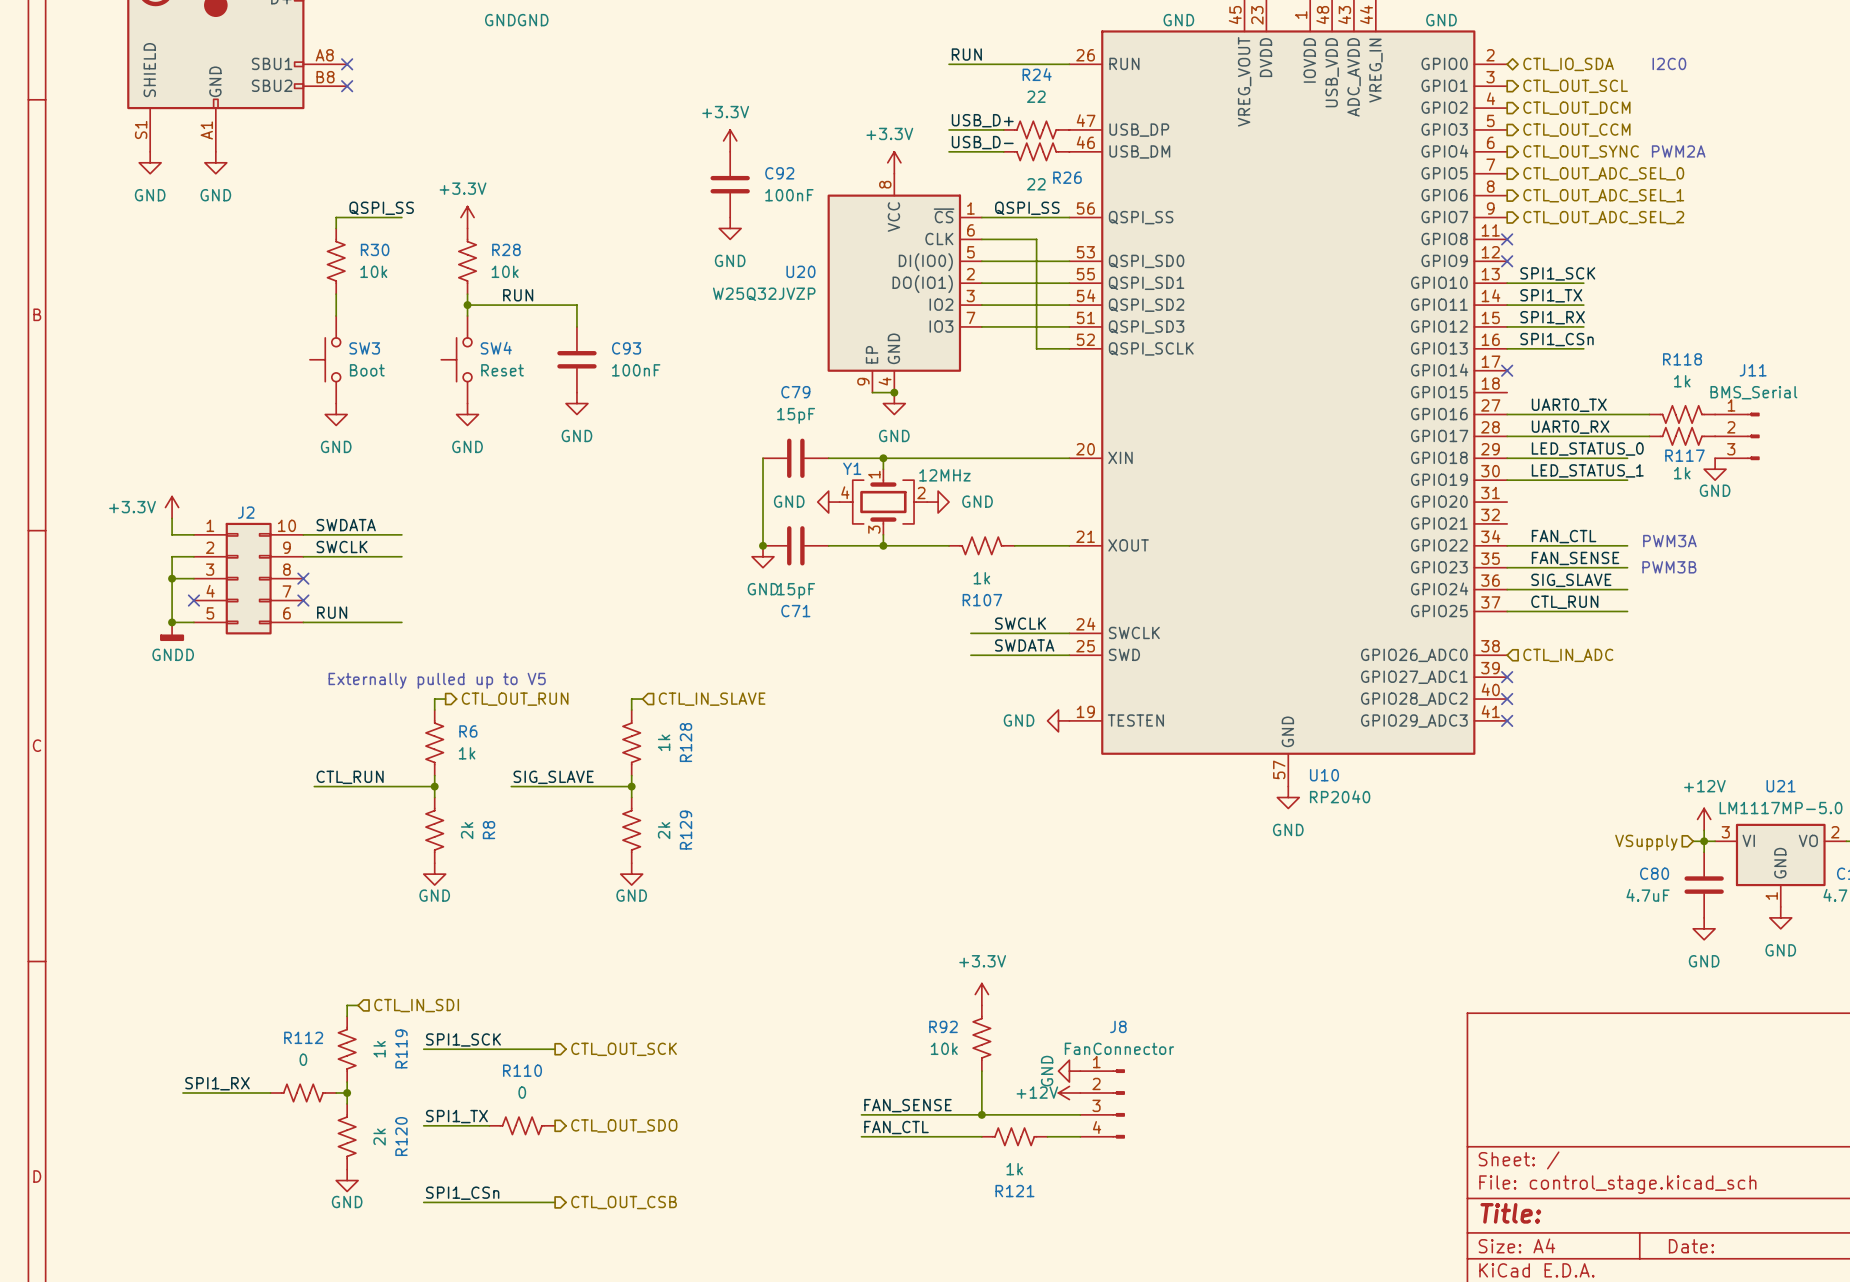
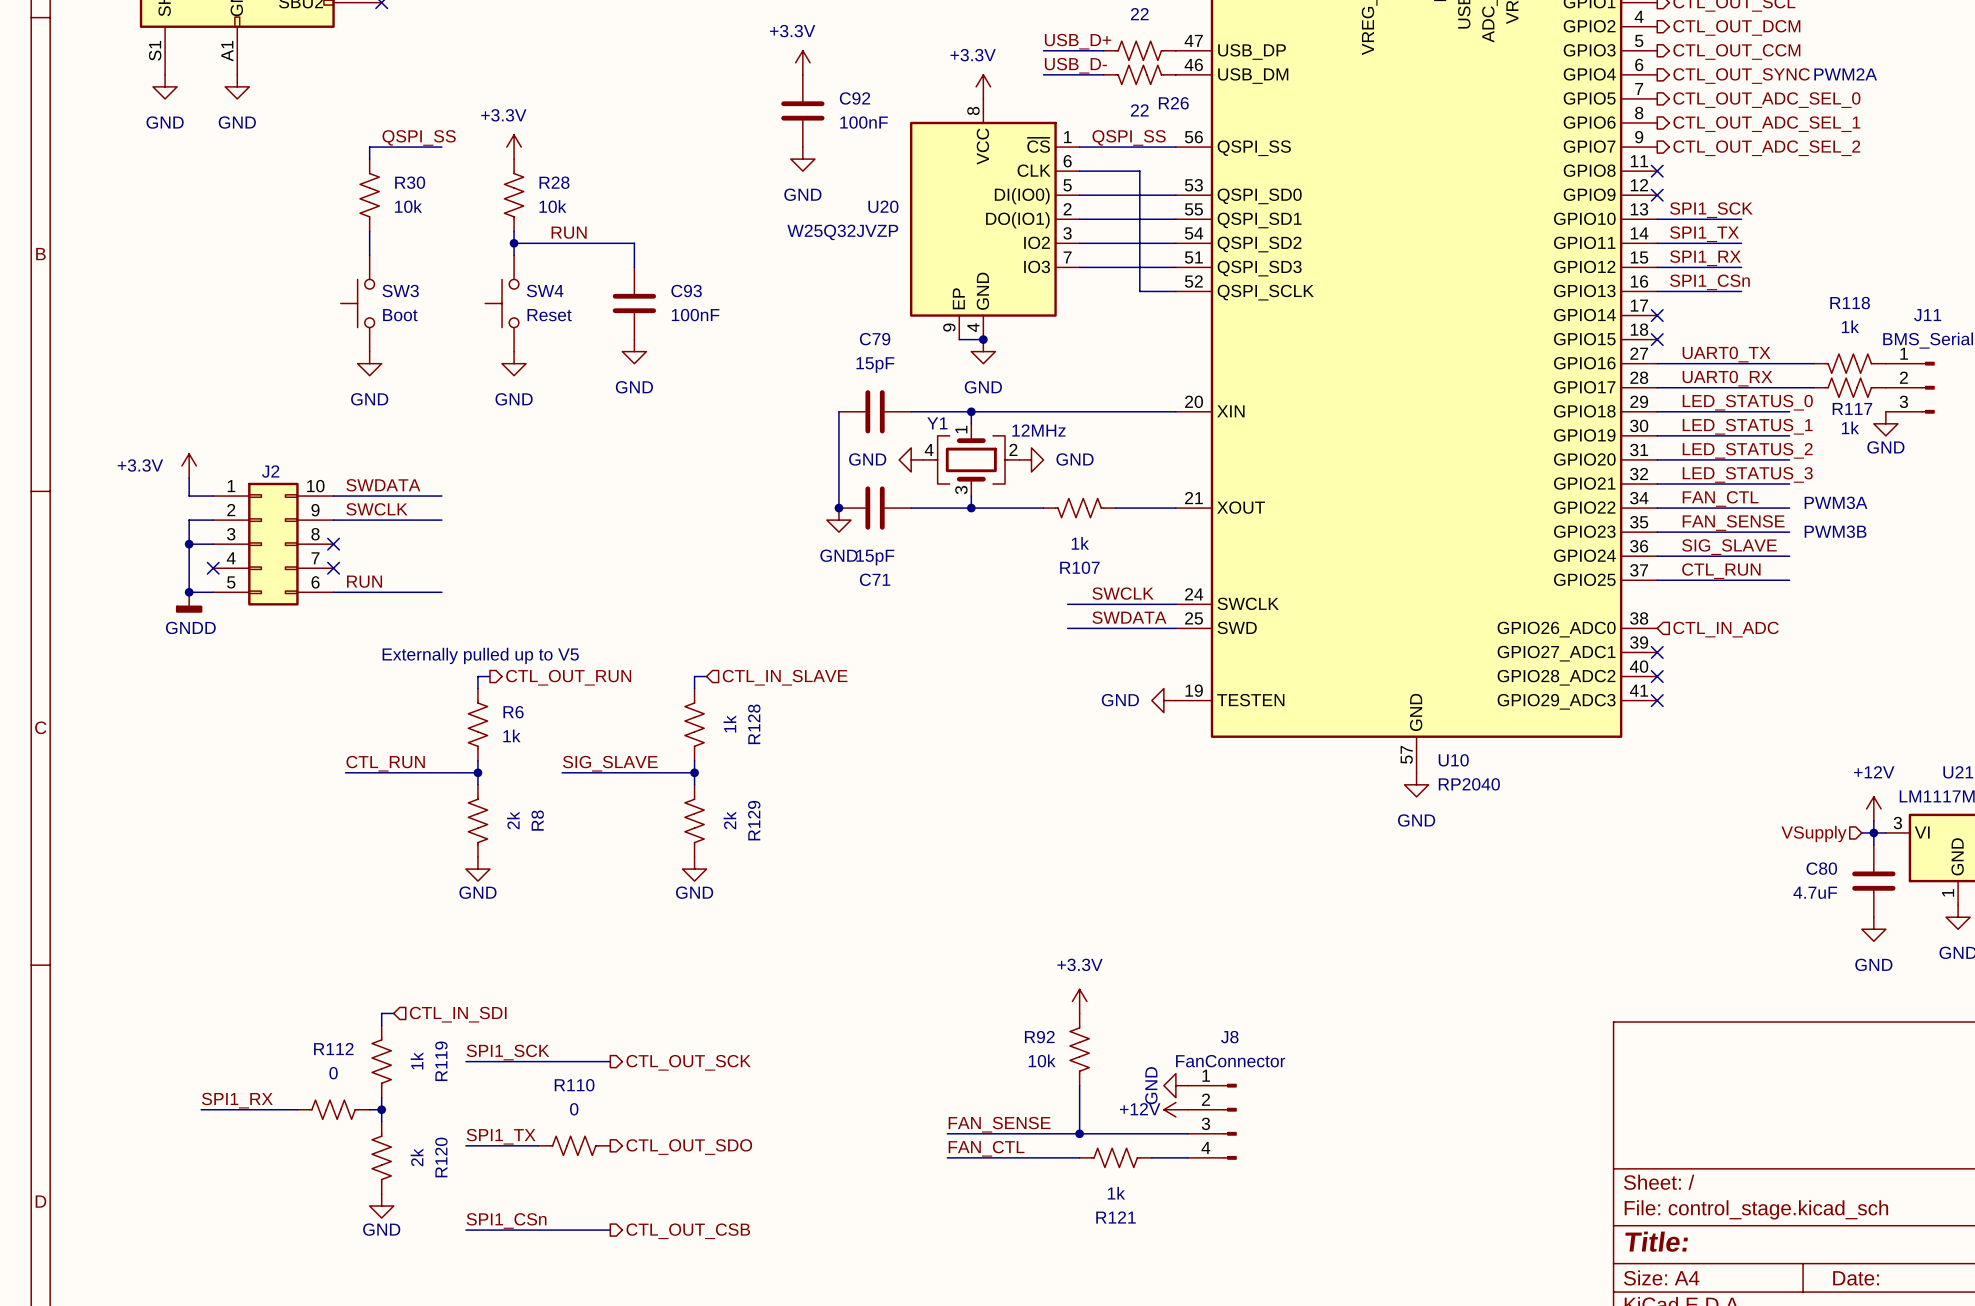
no-connect mark: none -> (1657, 339)
label: none -> LED_STATUS_2 (1747, 450)
wire: none -> (1657, 459) (1789, 459)
label: none -> LED_STATUS_3 (1747, 474)
wire: none -> (1657, 483) (1789, 483)

